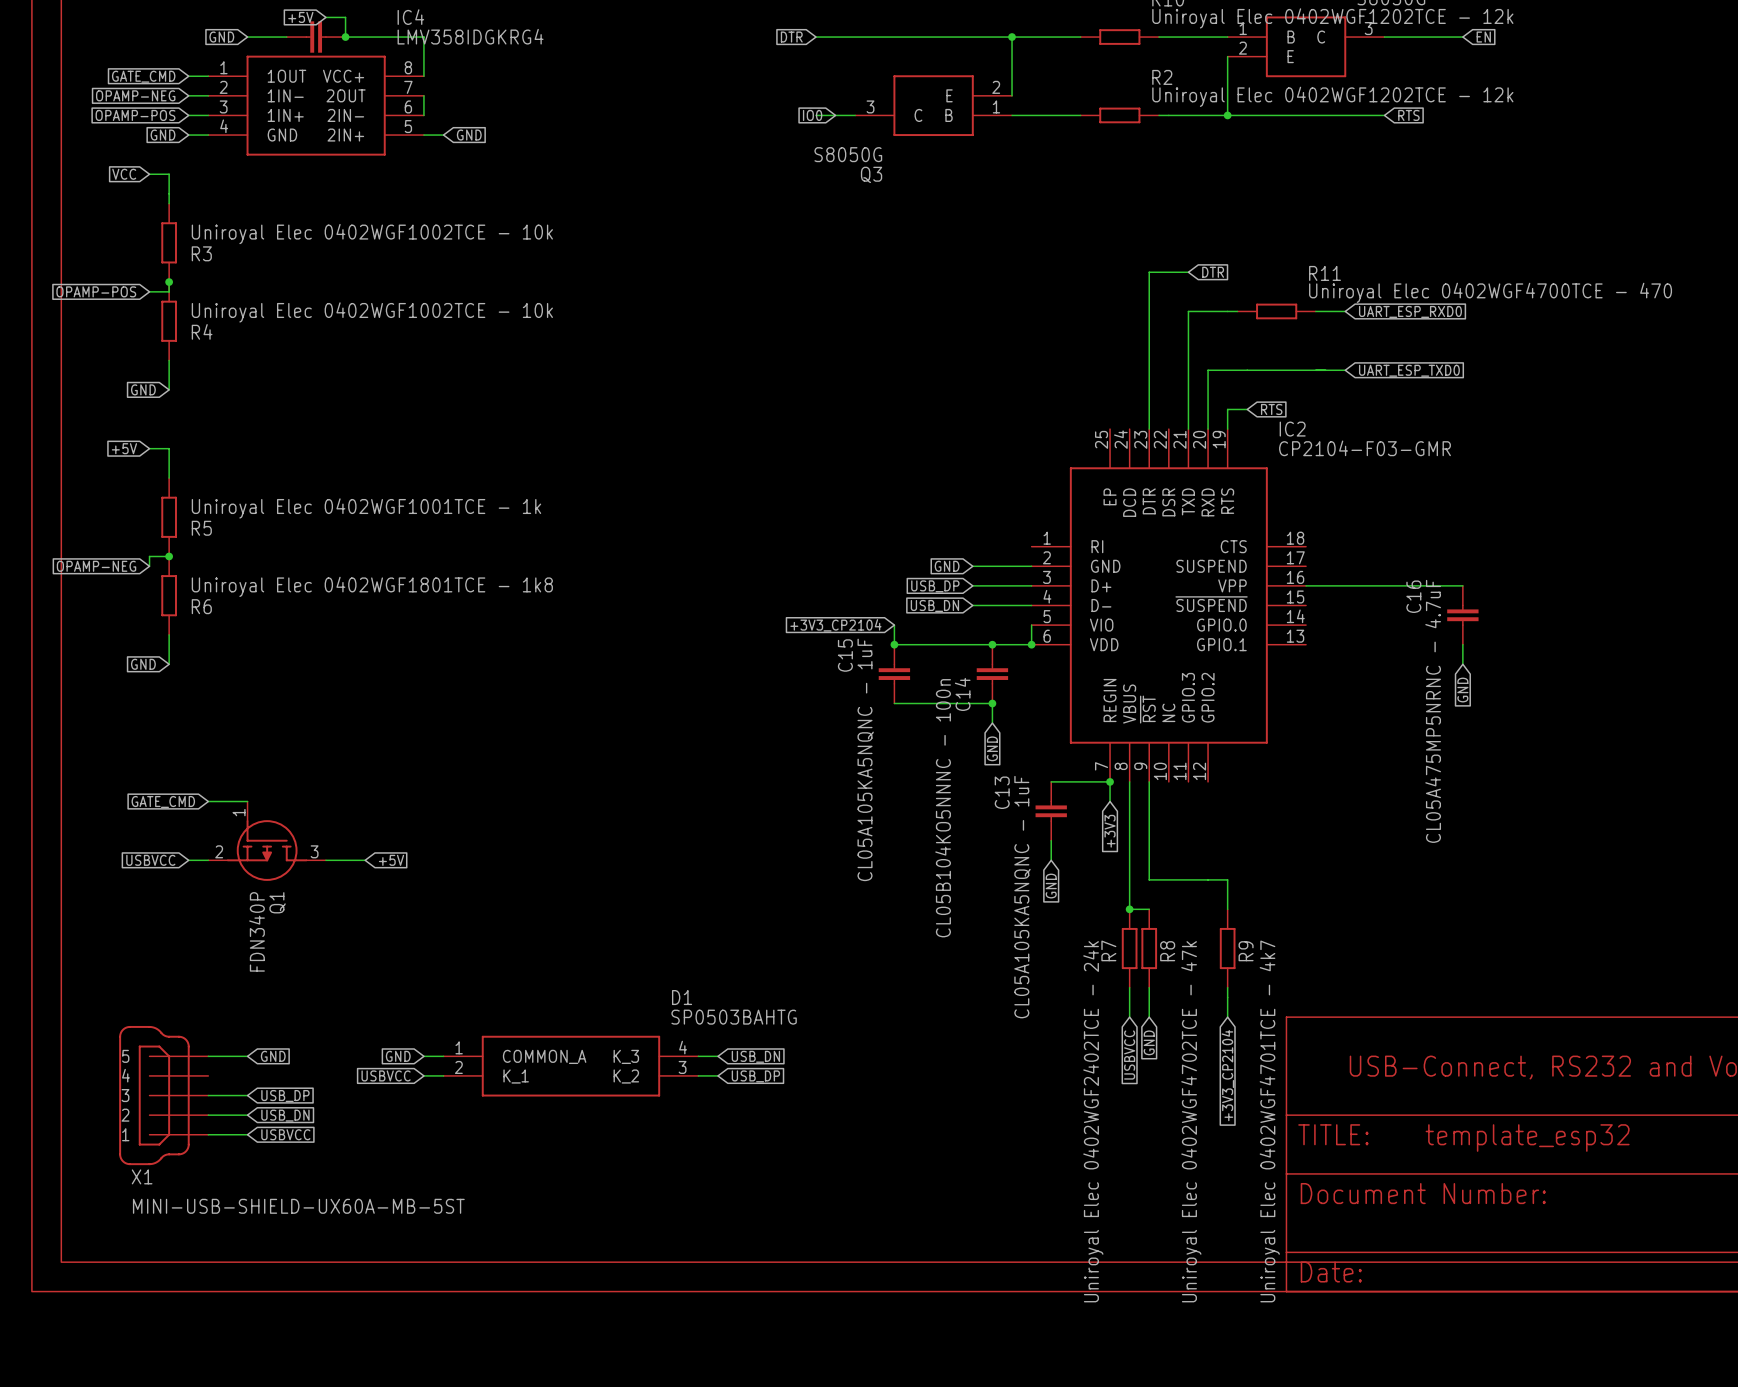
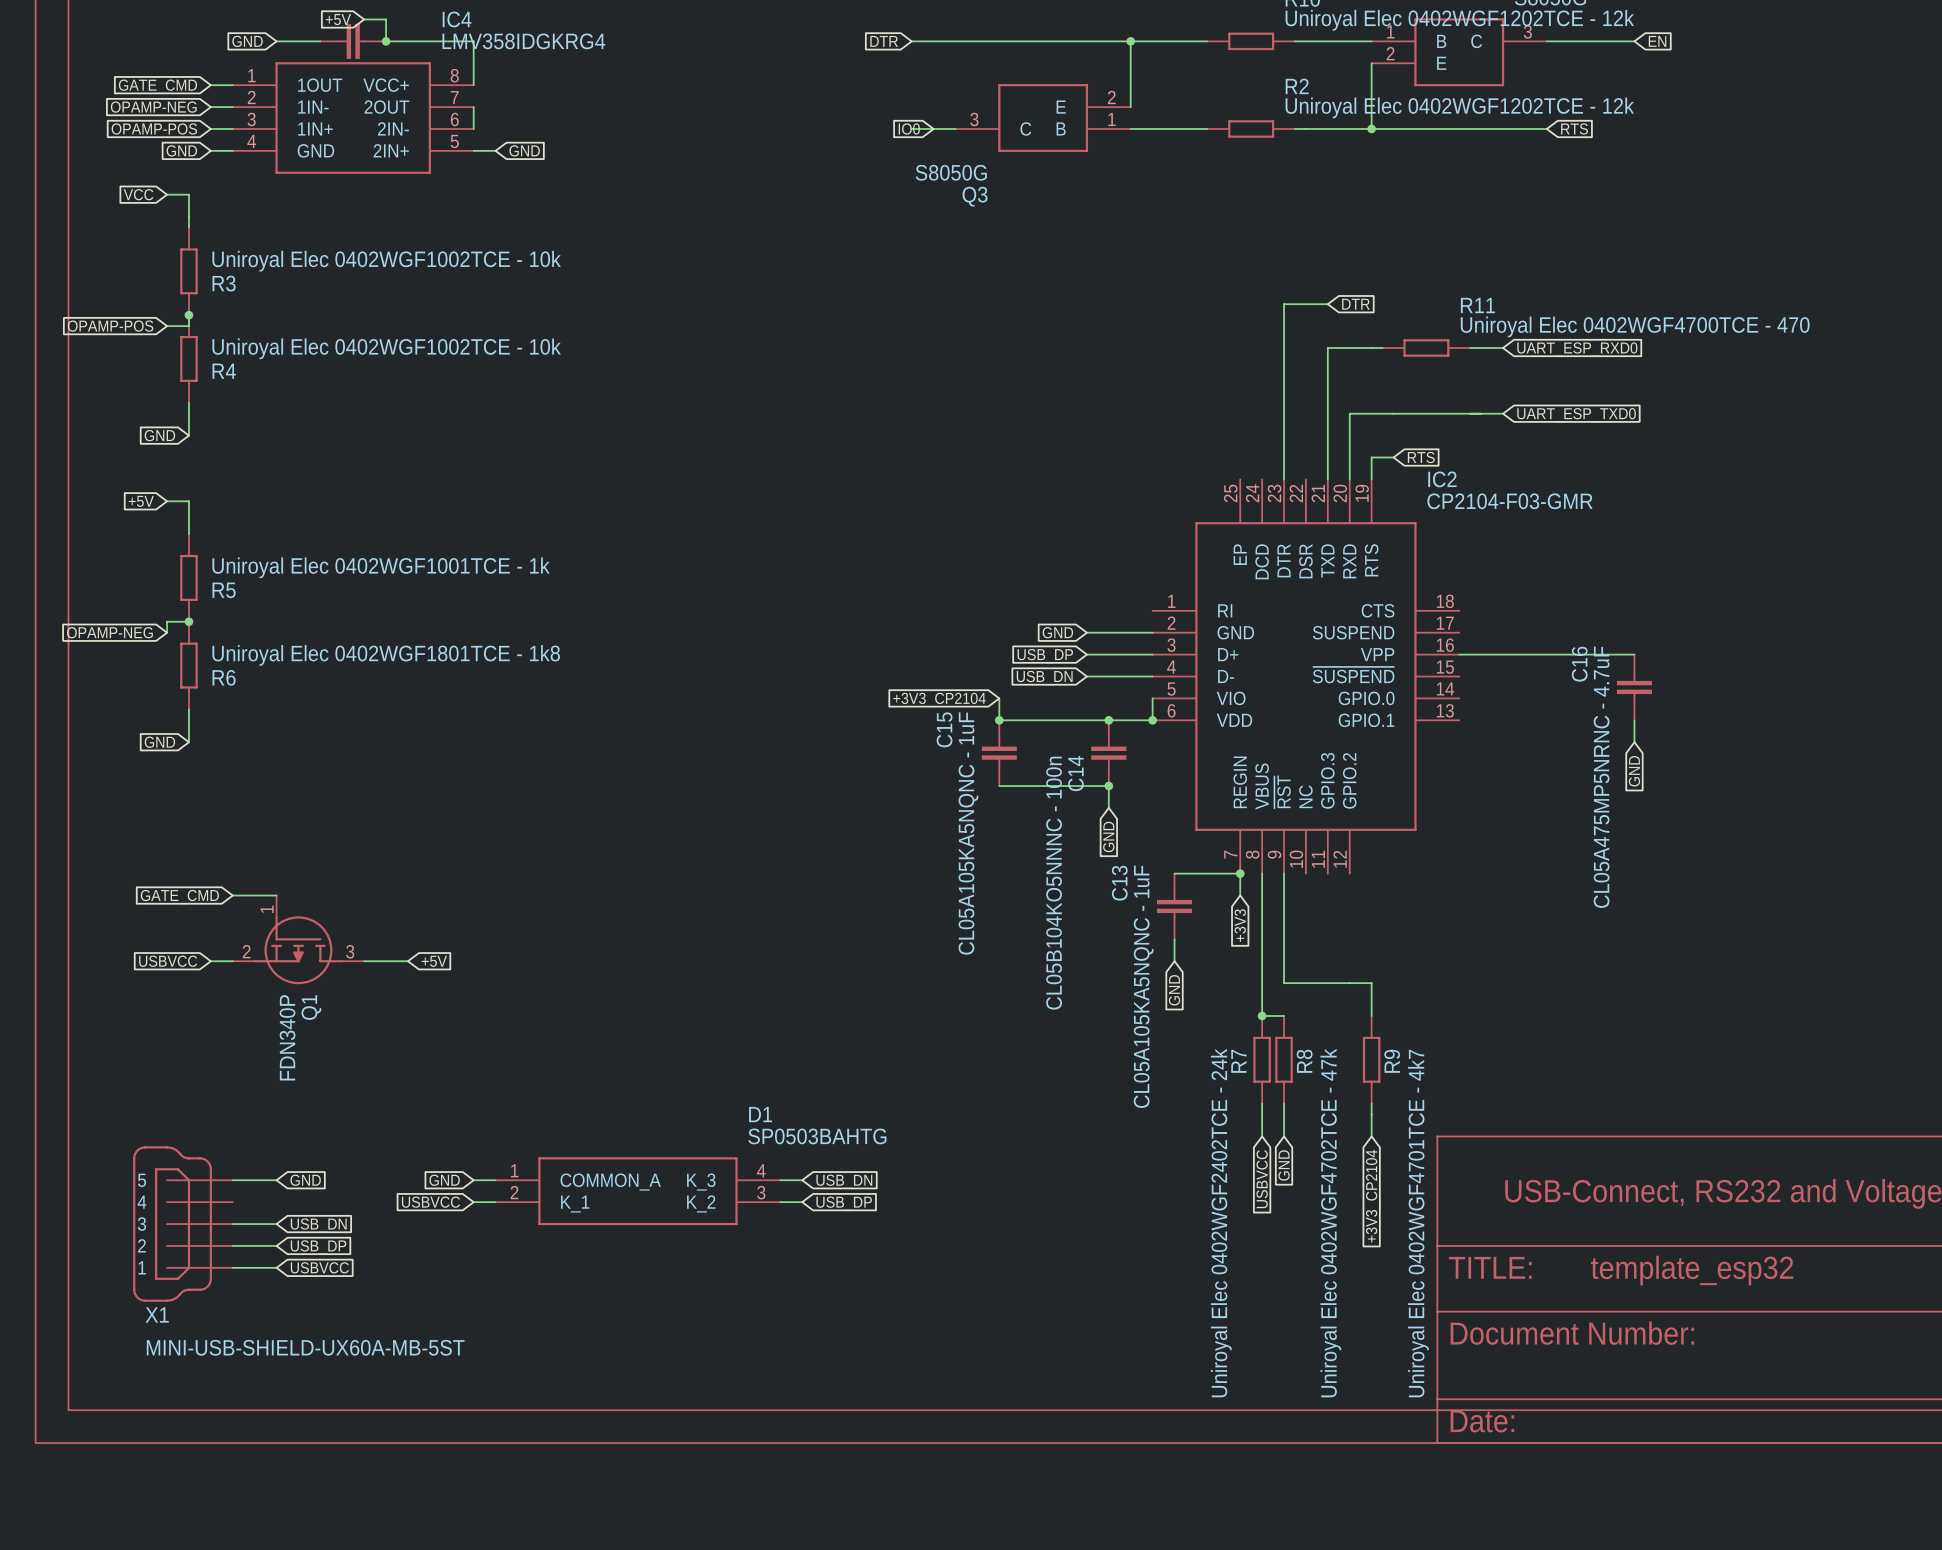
global label: USB_DP (285, 1096) -> USB_DN (318, 1225)
global label: USB_DN (285, 1115) -> USB_DP (318, 1247)

